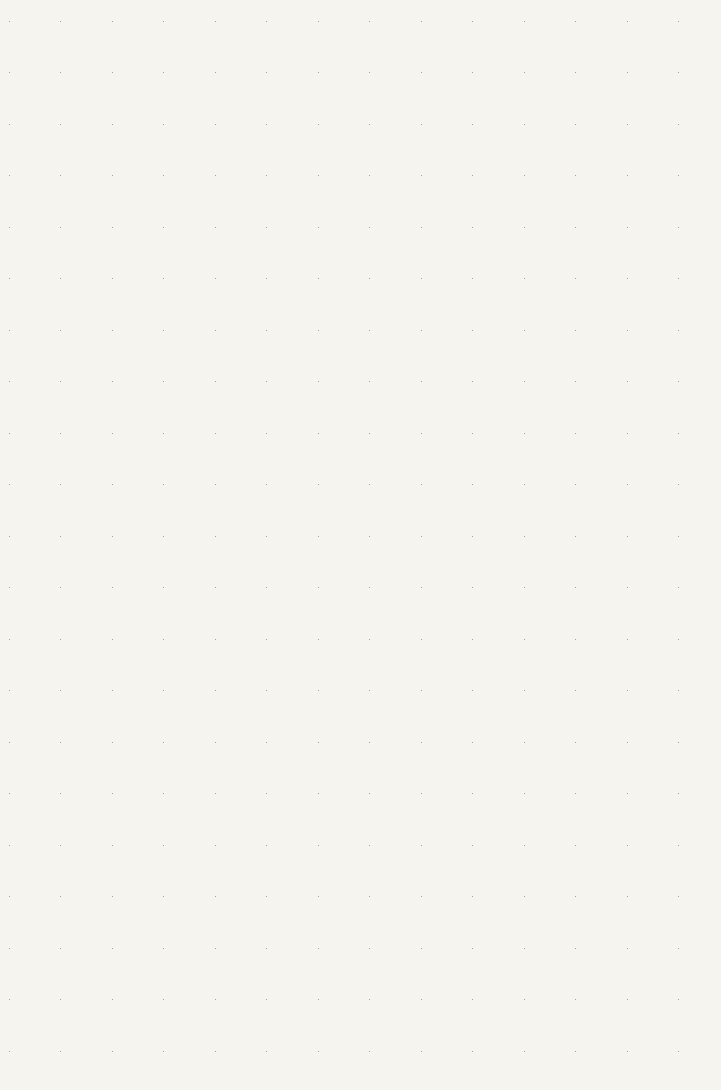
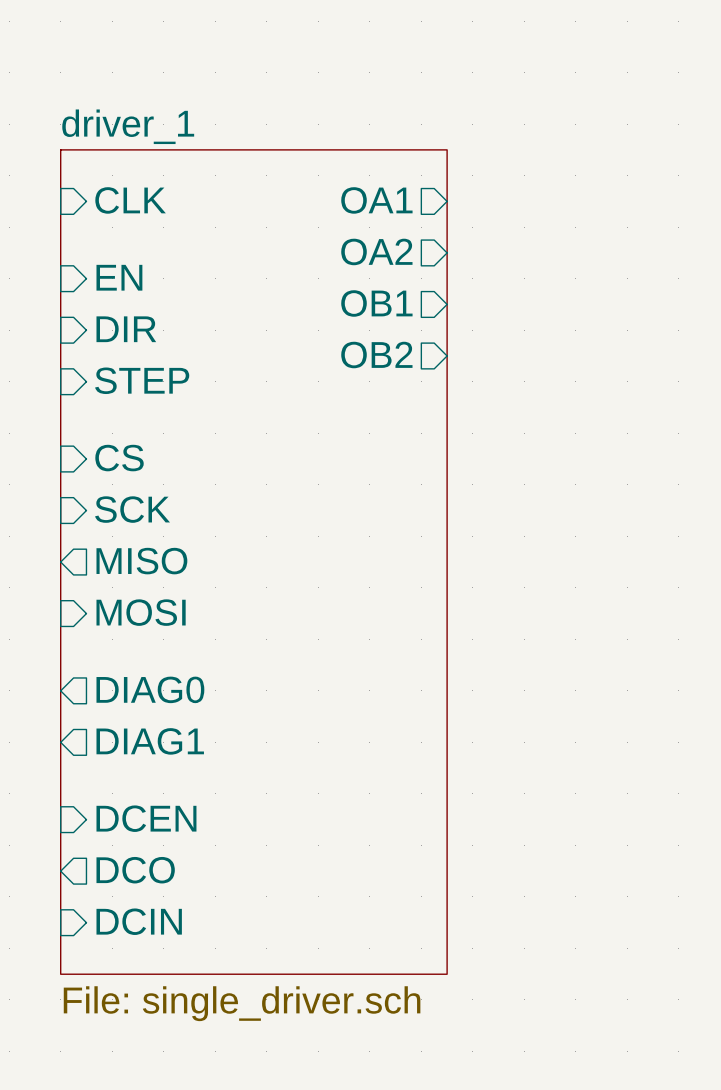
sheet pin: none -> CLK (130, 200)
sheet pin: none -> OA1 (376, 200)
sheet pin: none -> OA2 (376, 251)
sheet pin: none -> EN (119, 277)
sheet pin: none -> OB1 (376, 303)
sheet pin: none -> DIR (126, 329)
sheet pin: none -> OB2 (376, 355)
sheet pin: none -> STEP (142, 380)
sheet pin: none -> CS (119, 458)
sheet pin: none -> SCK (132, 509)
sheet pin: none -> MISO (141, 561)
sheet driver_1: none -> File: single_driver.sch (253, 562)
sheet pin: none -> MOSI (141, 612)
sheet pin: none -> DIAG0 (150, 689)
sheet pin: none -> DIAG1 (150, 741)
sheet pin: none -> DCEN (146, 818)
sheet pin: none -> DCO (135, 870)
sheet pin: none -> DCIN (139, 921)

